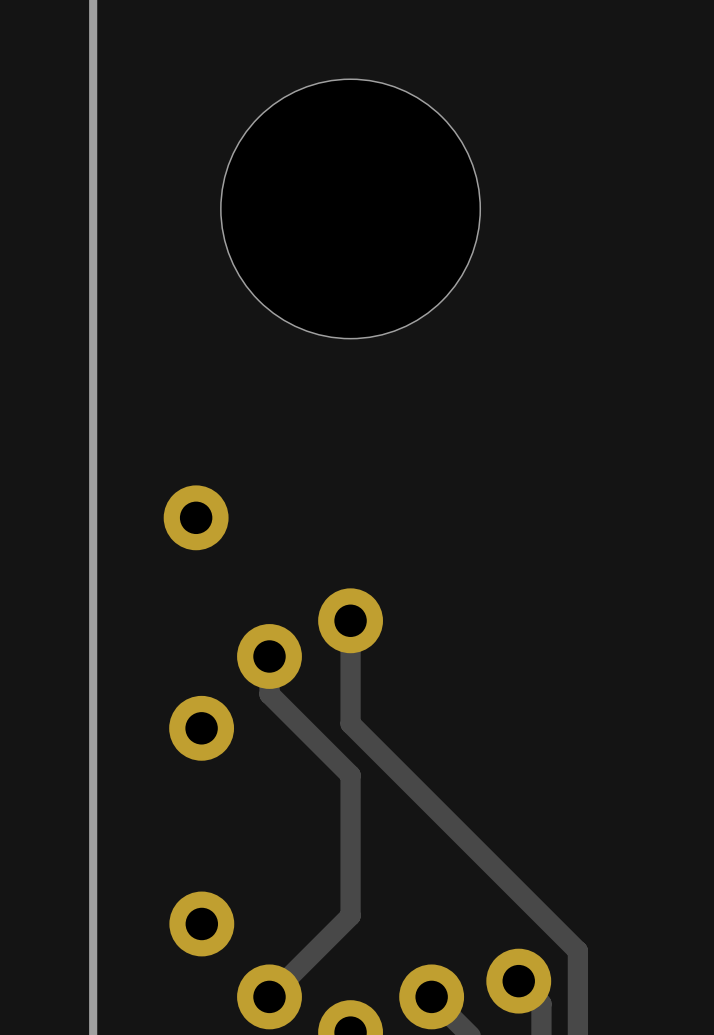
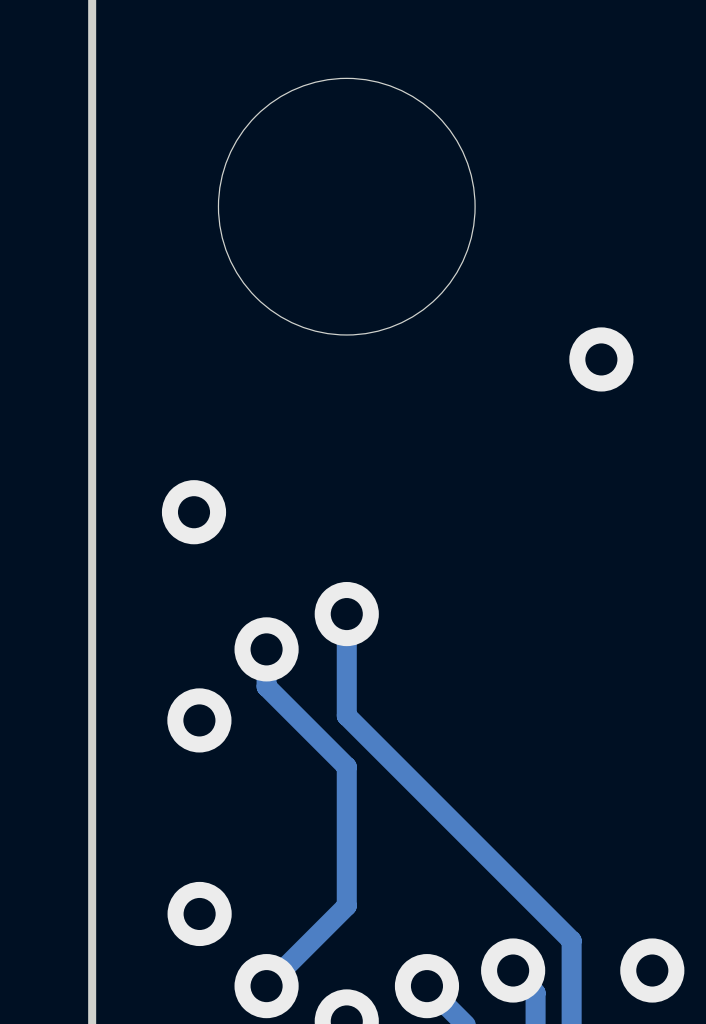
via: none -> (601, 359)
via: none -> (652, 970)

